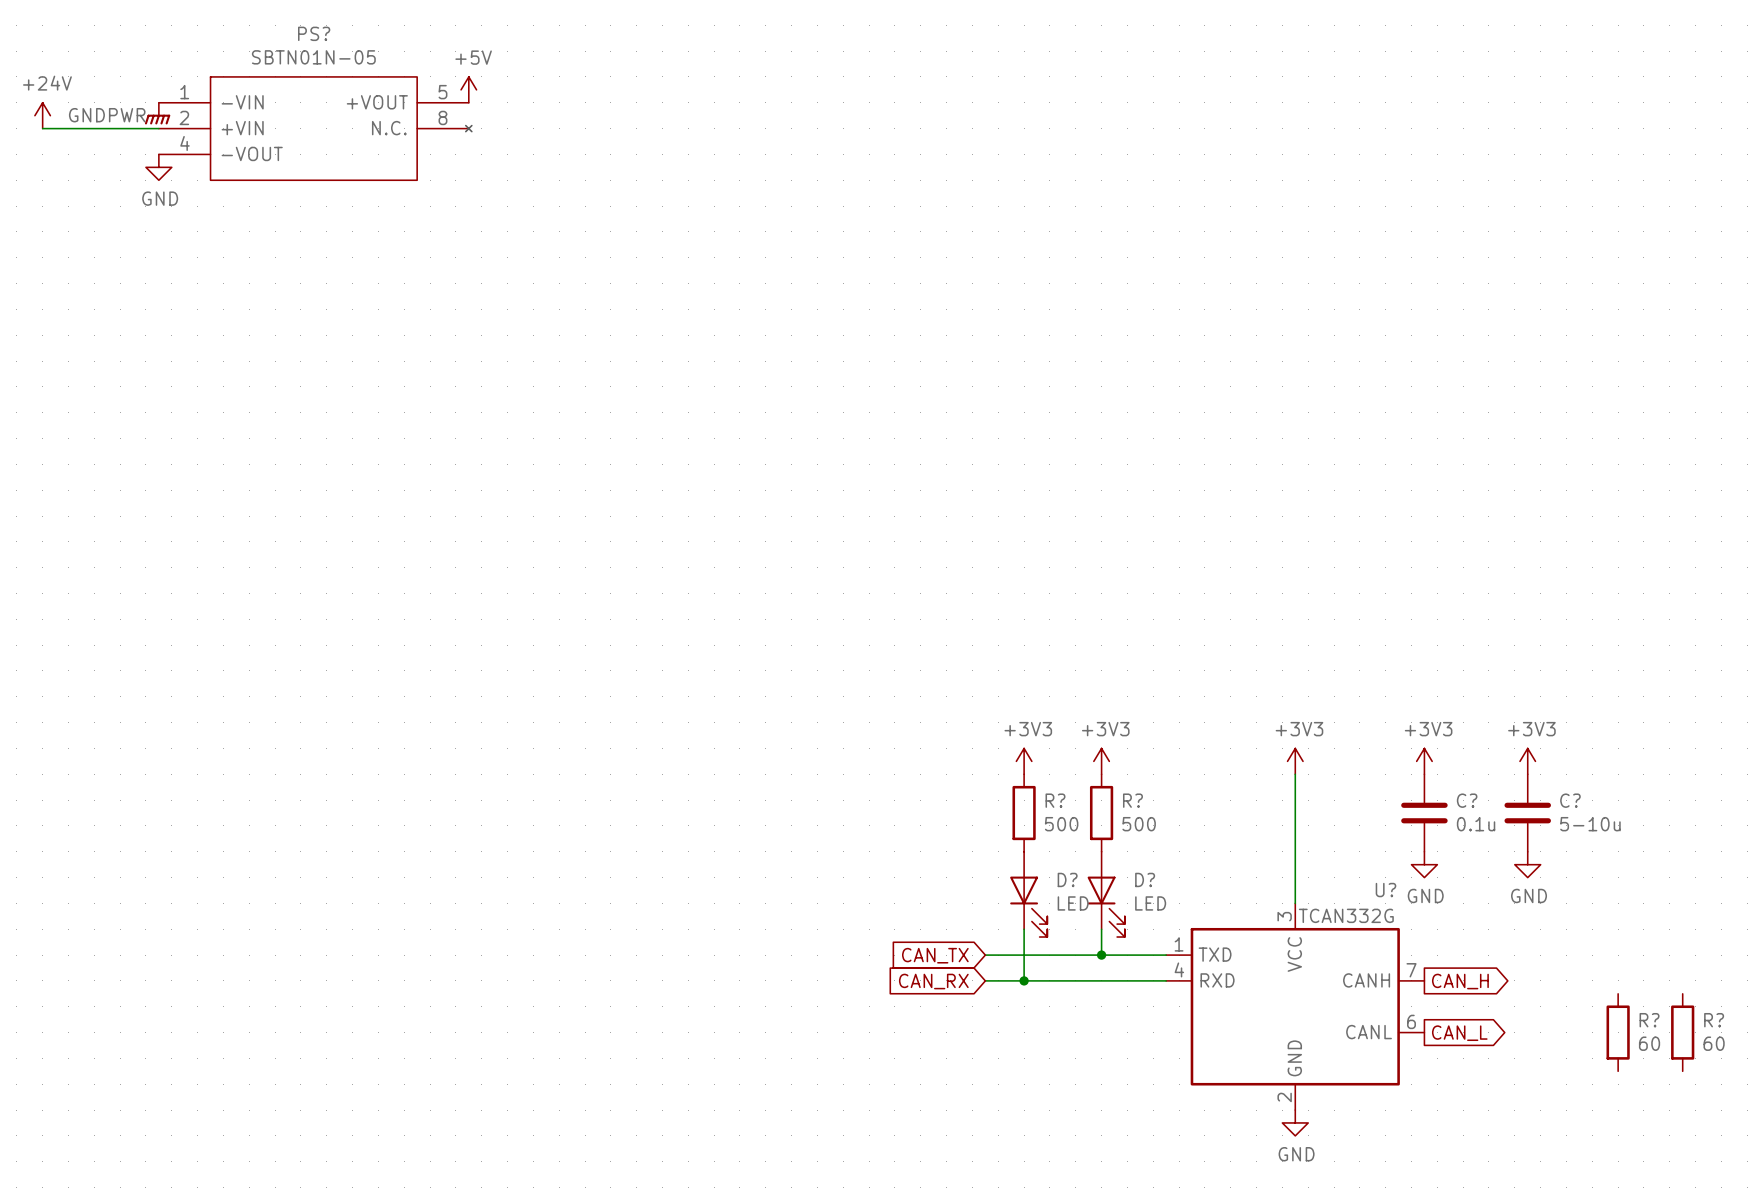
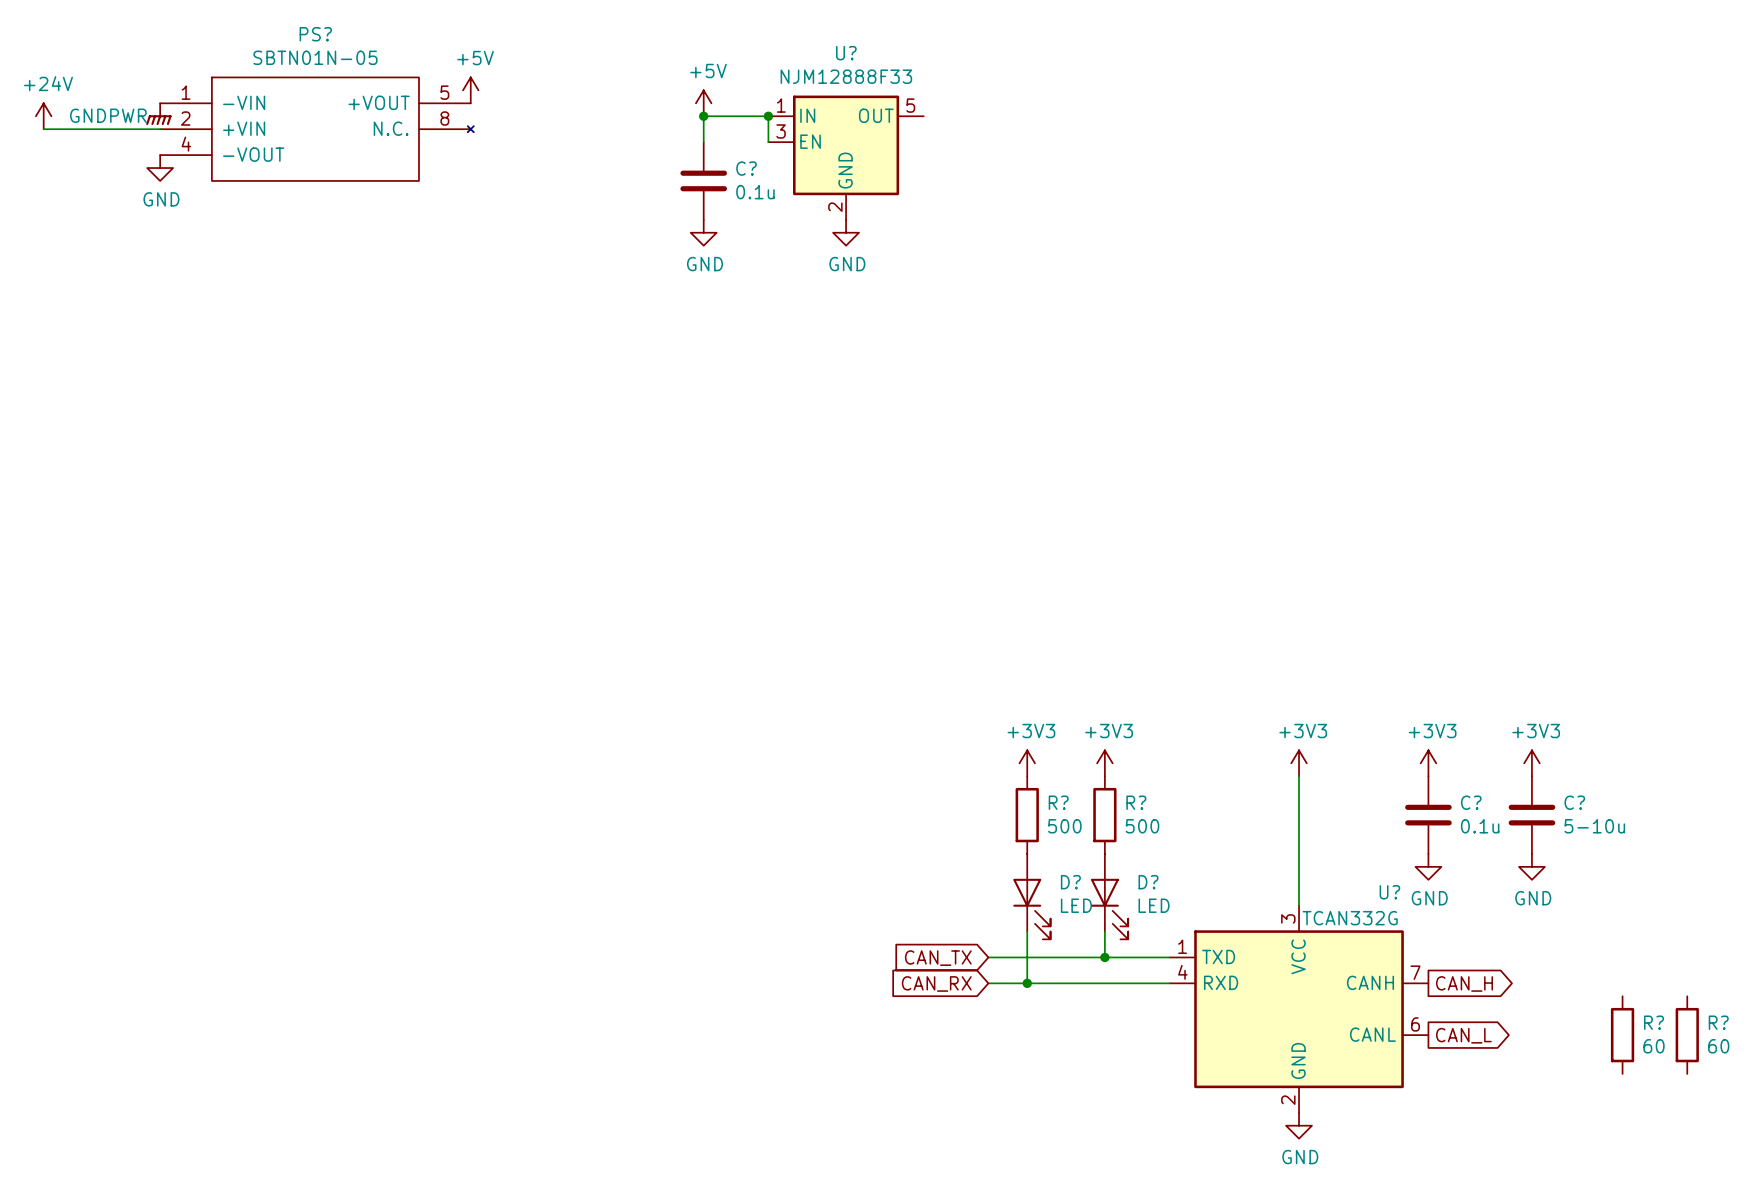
power symbol: none -> +5V (703, 103)
junction: none -> (703, 116)
junction: none -> (768, 116)
wire: none -> (703, 142) (703, 116) (768, 116) (768, 142)
U?: none -> NJM12888F33 (846, 157)
C?: none -> 0.1u (703, 180)
power symbol: none -> GND (703, 232)
power symbol: none -> GND (846, 232)

